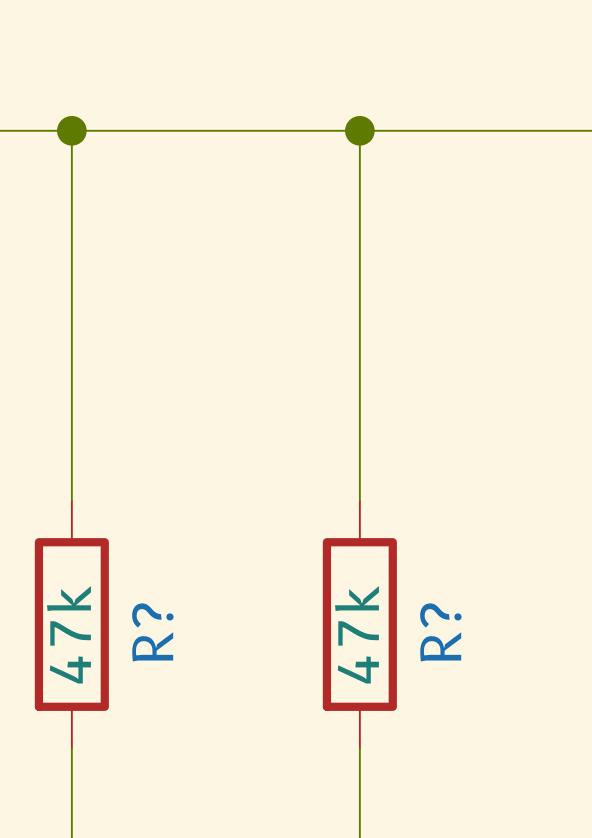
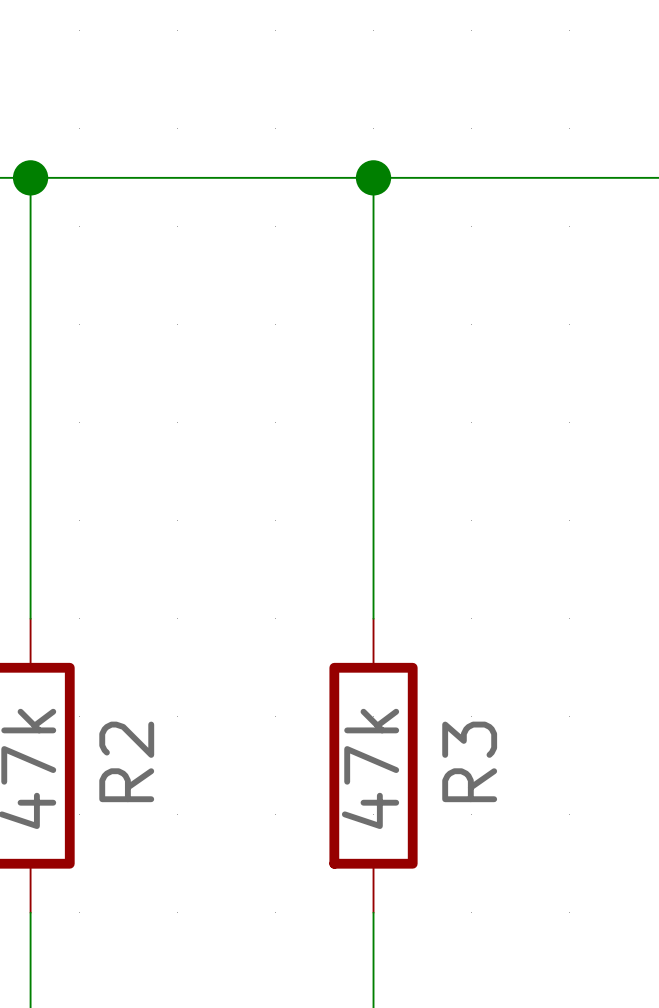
R? name: R? (152, 632) -> R2 (126, 761)
R? name: R? (440, 632) -> R3 (469, 761)

